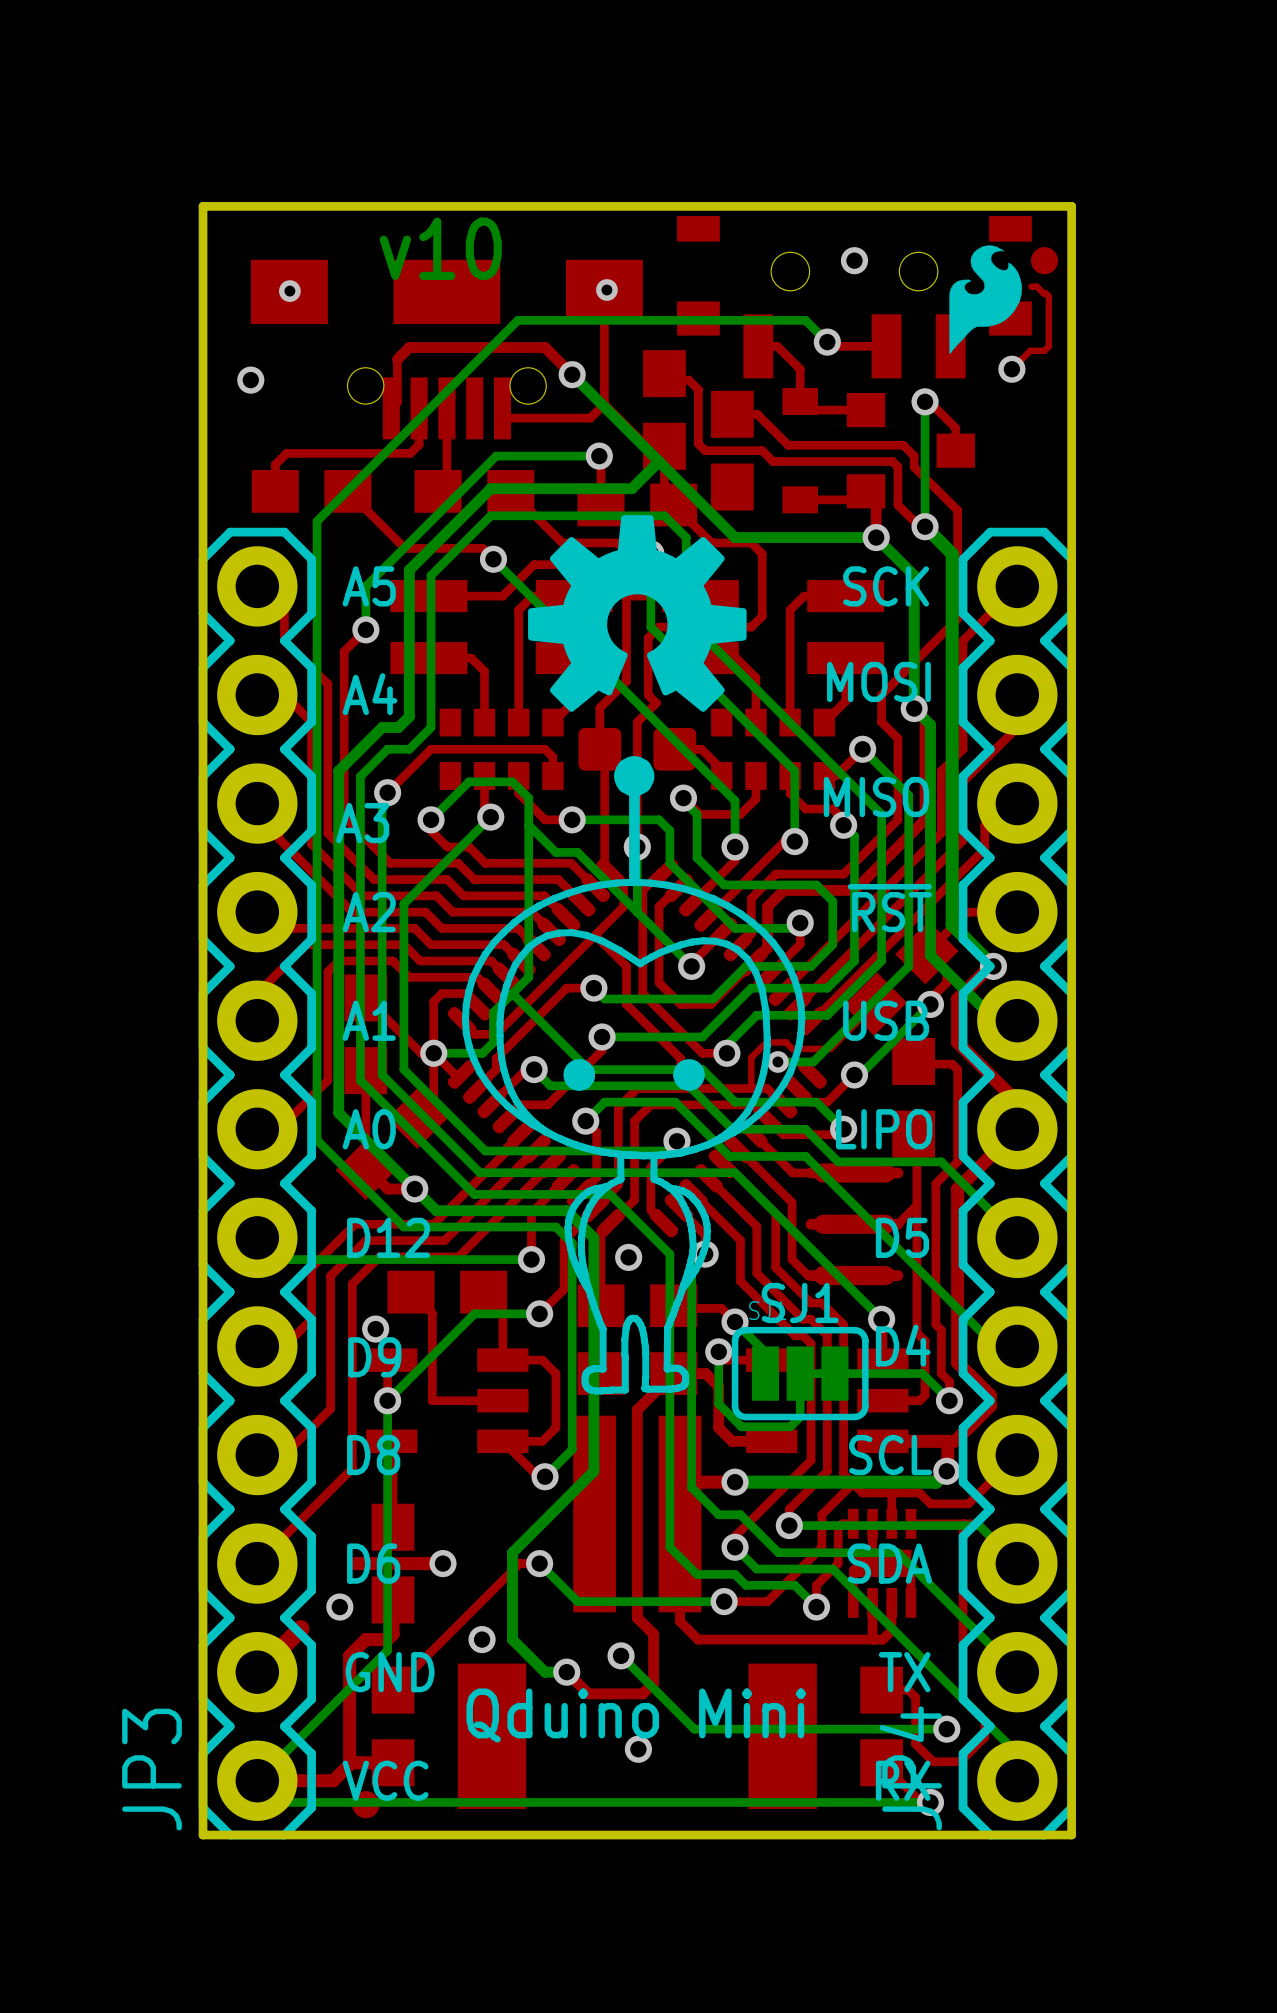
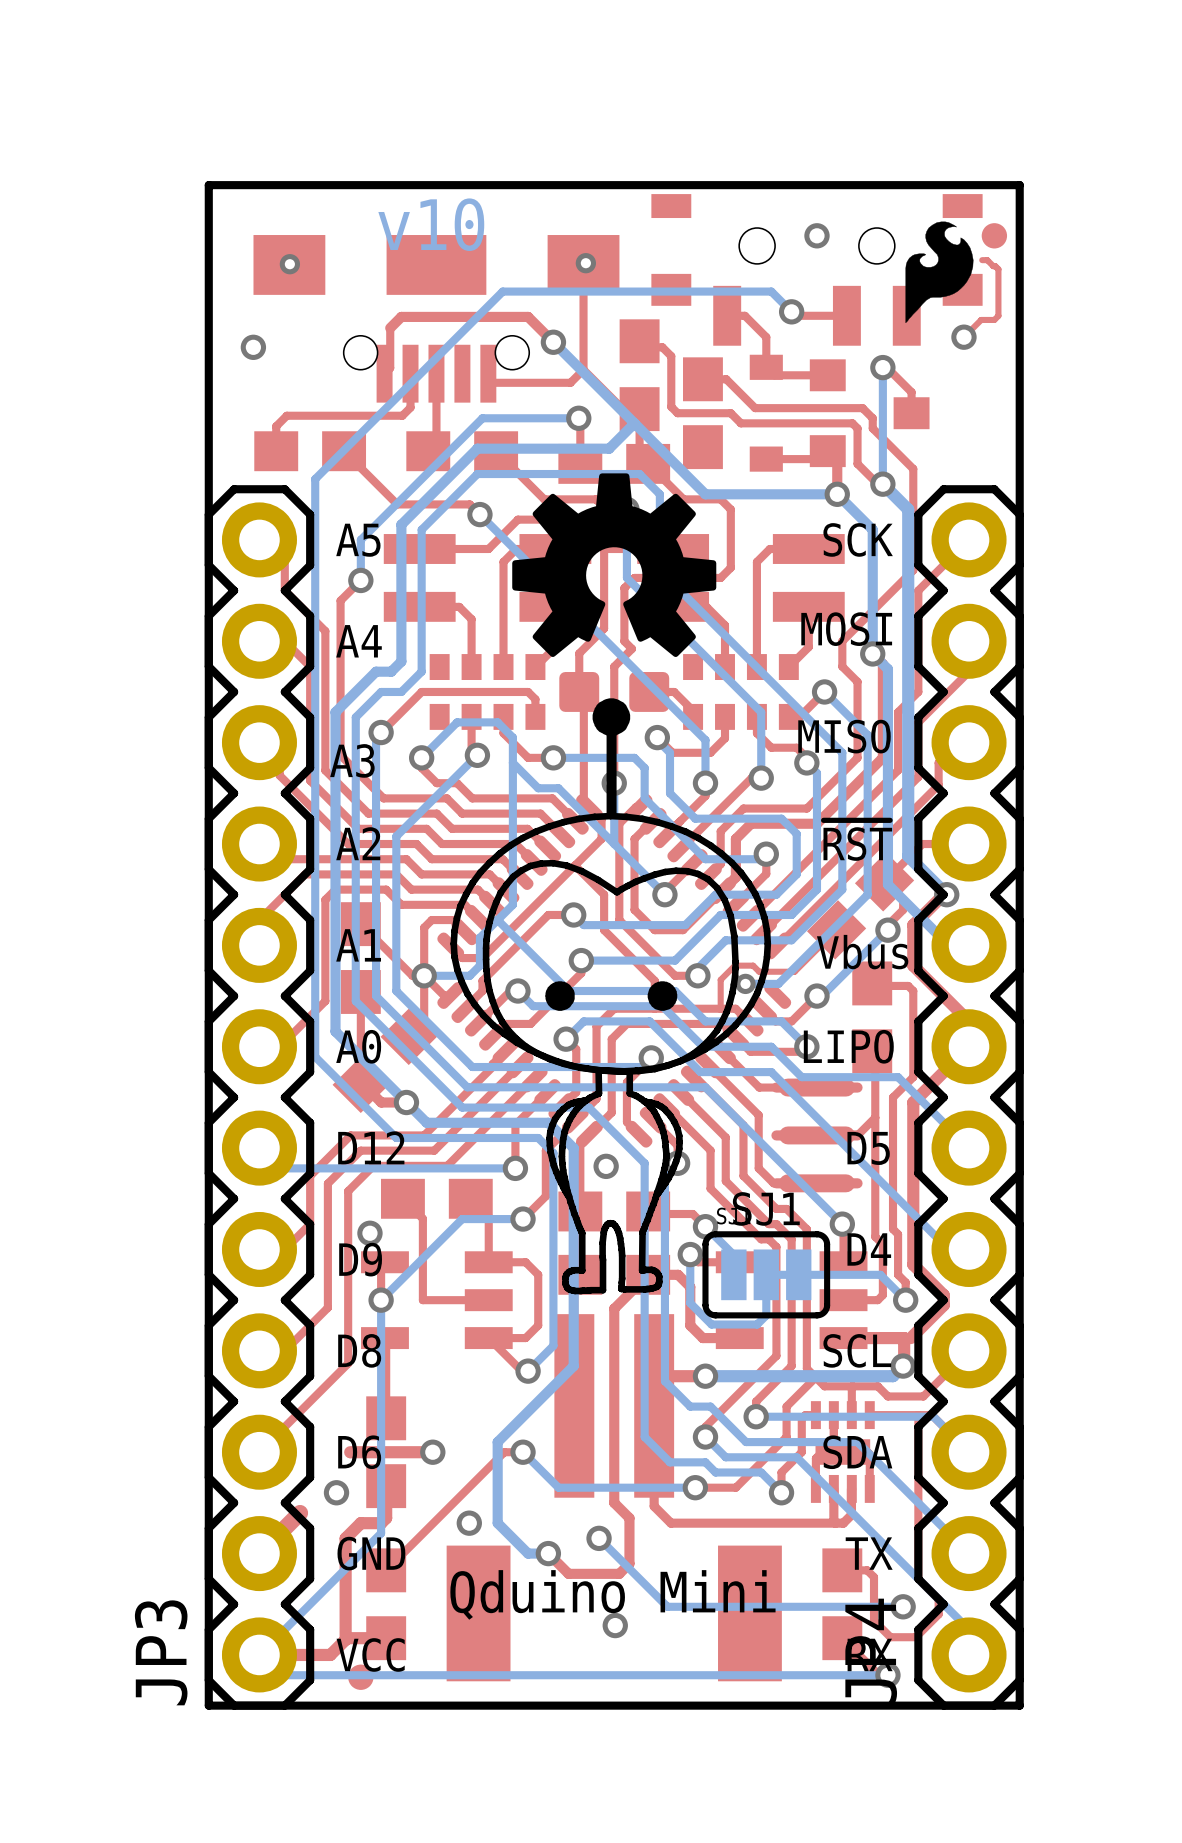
text: USB (886, 1020) -> Vbus (862, 952)

